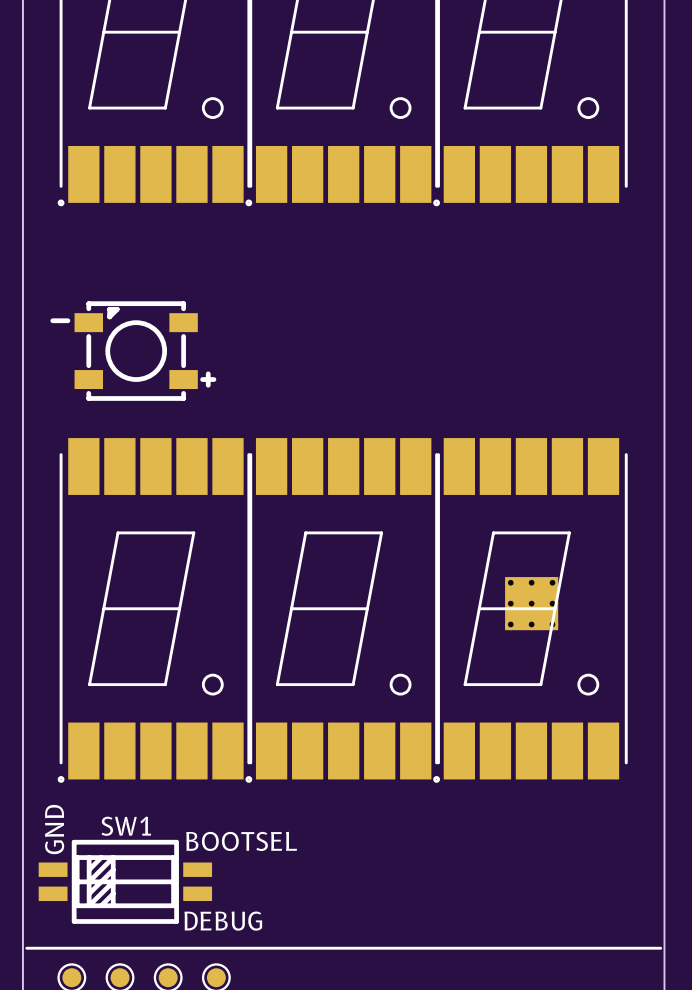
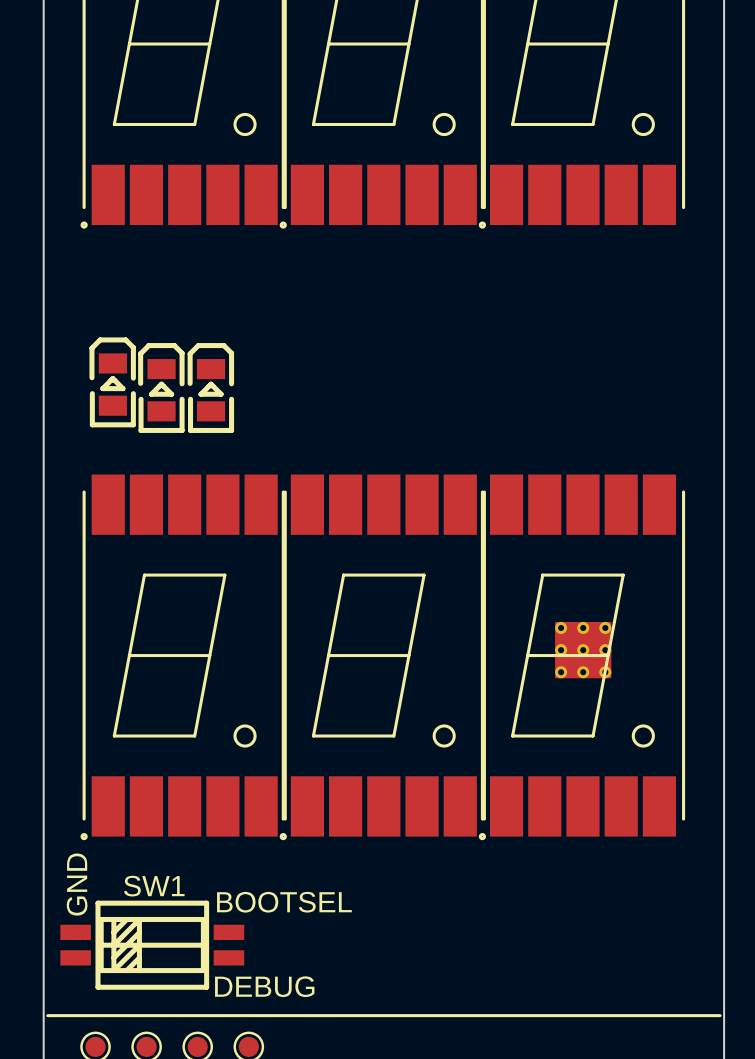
part footprint: [50, 301, 217, 401] -> [138, 343, 185, 433]
part: none -> (112, 382)
part: none -> (210, 388)

